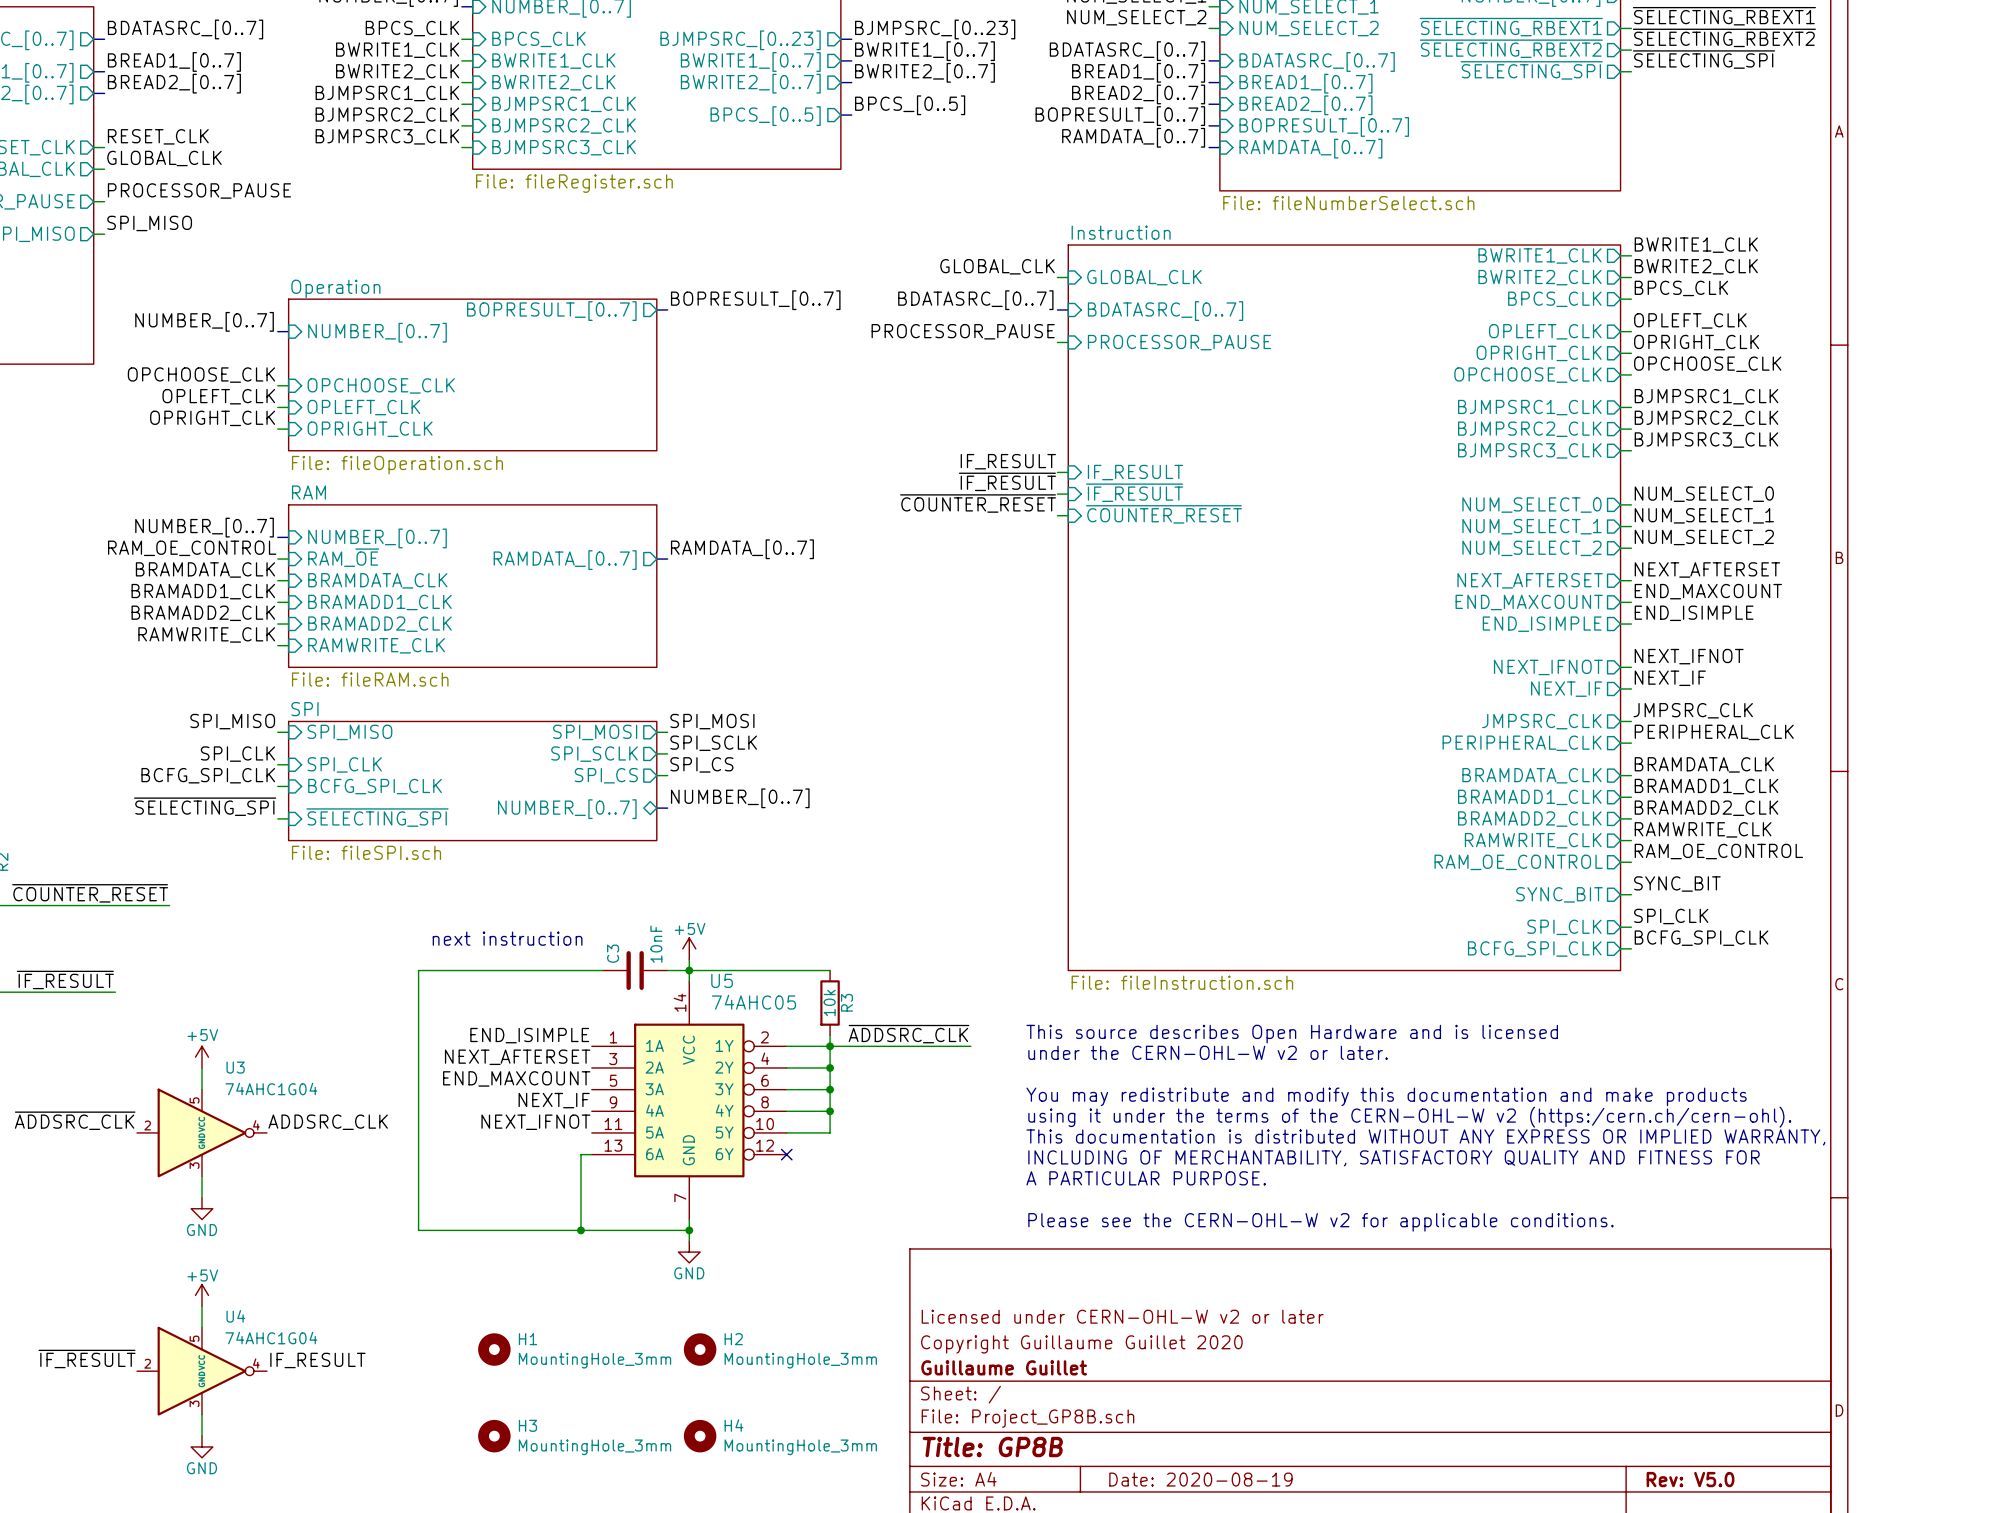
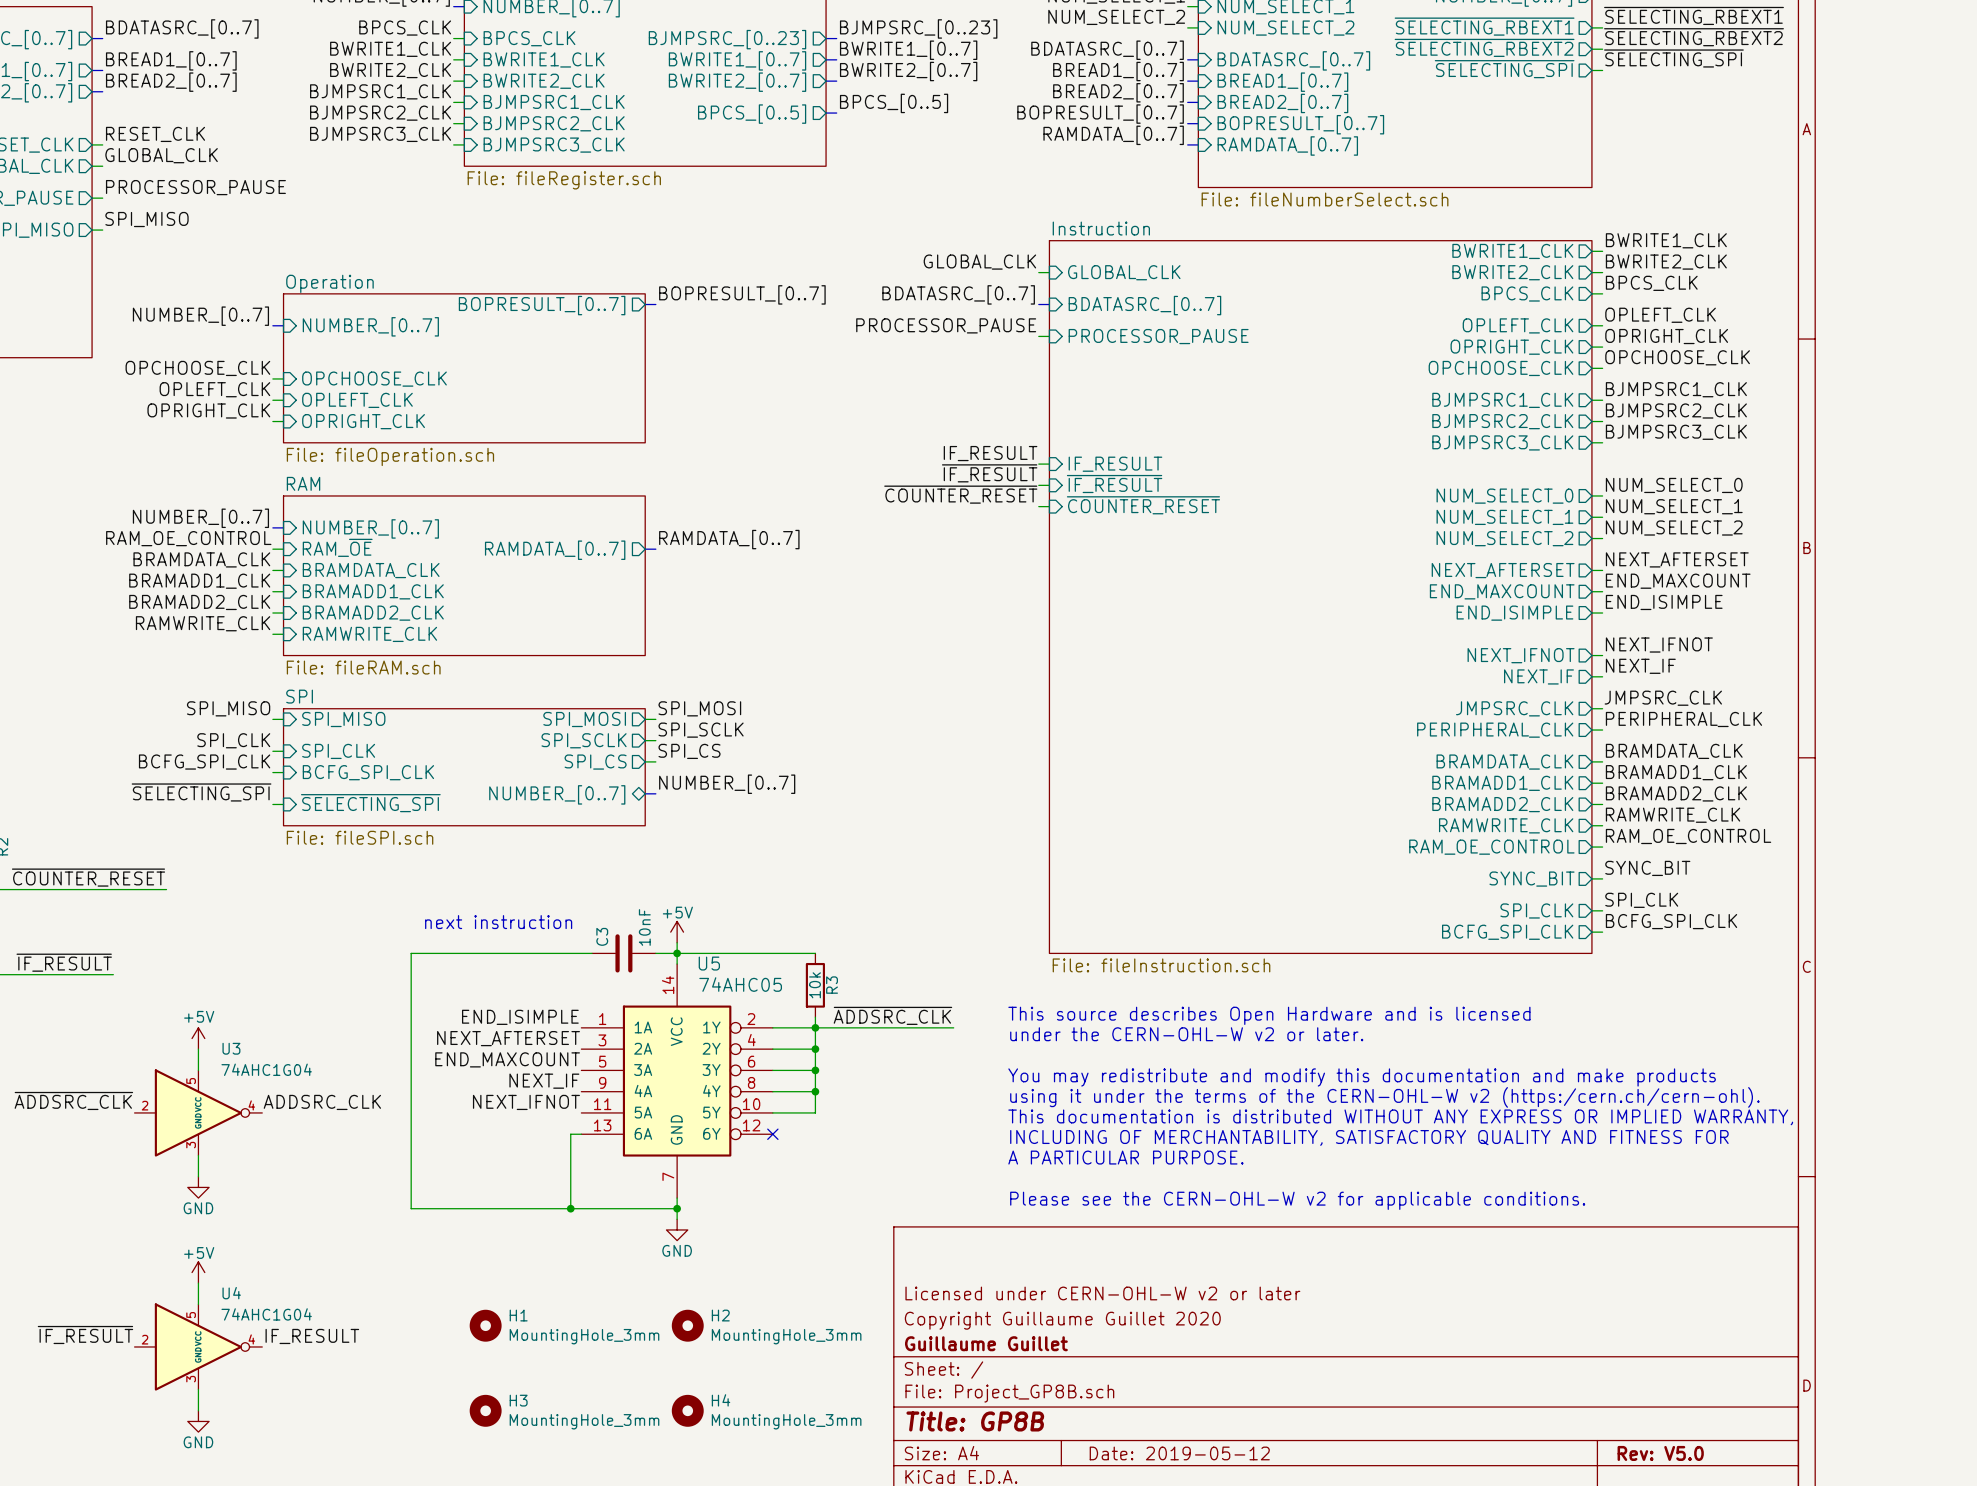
title block: Date: 2020-08-19 (1200, 1479) -> Date: 2019-05-12 (1179, 1453)

